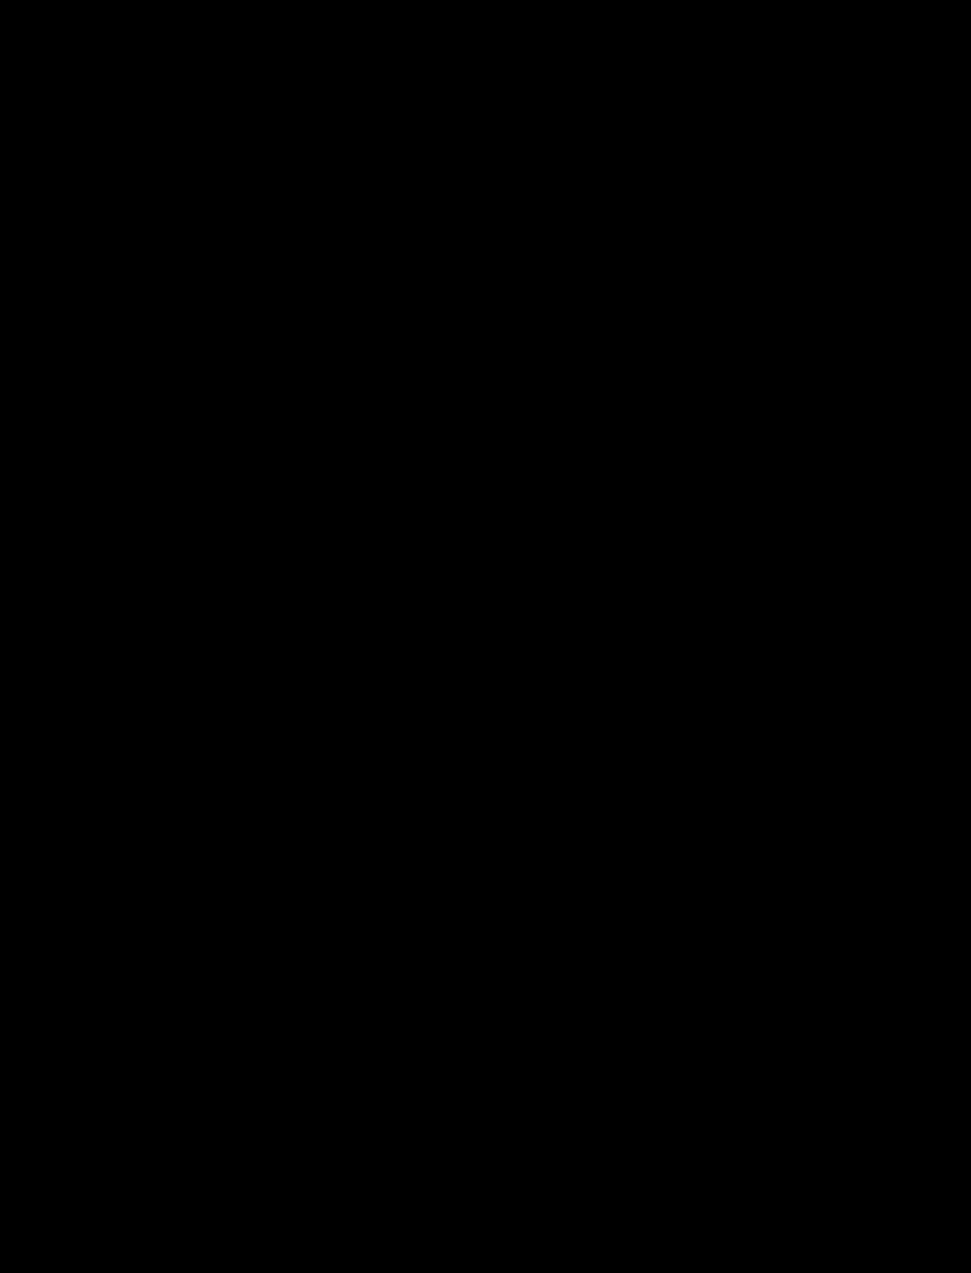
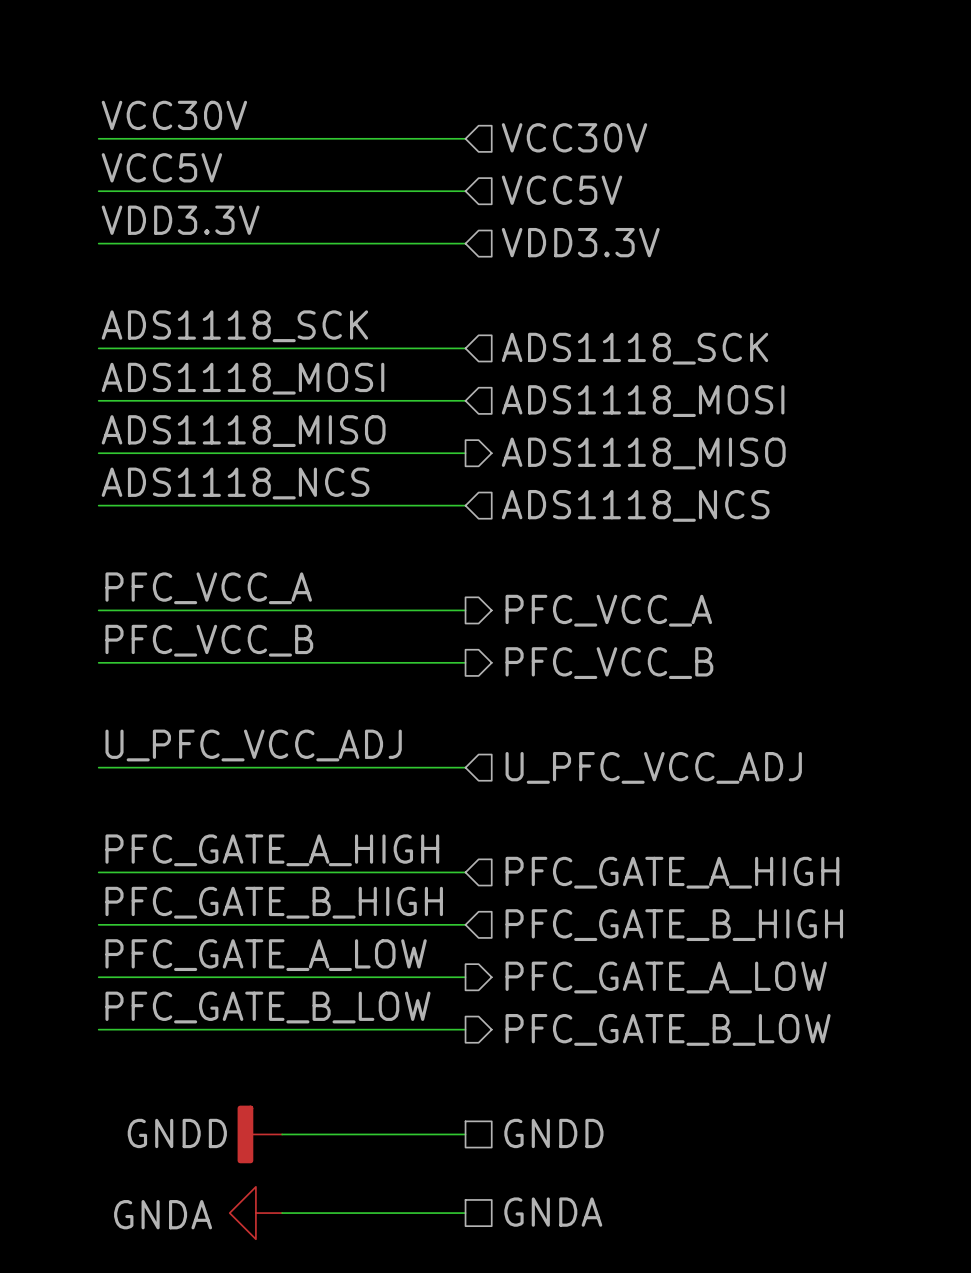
label: none -> VCC30V (174, 115)
hierarchical label: none -> VCC30V (574, 137)
wire: none -> (98, 138) (465, 138)
label: none -> VCC5V (161, 167)
hierarchical label: none -> VCC5V (562, 190)
wire: none -> (98, 191) (465, 191)
label: none -> VDD3.3V (180, 220)
hierarchical label: none -> VDD3.3V (580, 242)
wire: none -> (98, 243) (465, 243)
label: none -> ADS1118_SCK (234, 326)
wire: none -> (98, 348) (465, 348)
hierarchical label: none -> ADS1118_SCK (635, 348)
label: none -> ADS1118_MOSI (243, 378)
wire: none -> (98, 400) (465, 400)
hierarchical label: none -> ADS1118_MOSI (643, 401)
label: none -> ADS1118_MISO (243, 431)
wire: none -> (98, 453) (465, 453)
hierarchical label: none -> ADS1118_MISO (643, 453)
label: none -> ADS1118_NCS (235, 483)
wire: none -> (98, 505) (465, 505)
hierarchical label: none -> ADS1118_NCS (635, 505)
label: none -> PFC_VCC_A (208, 588)
wire: none -> (98, 610) (465, 610)
hierarchical label: none -> PFC_VCC_A (608, 610)
label: none -> PFC_VCC_B (209, 640)
wire: none -> (98, 662) (465, 662)
hierarchical label: none -> PFC_VCC_B (609, 663)
label: none -> U_PFC_VCC_ADJ (253, 745)
wire: none -> (98, 767) (465, 767)
hierarchical label: none -> U_PFC_VCC_ADJ (653, 767)
label: none -> PFC_GATE_A_HIGH (272, 850)
wire: none -> (98, 872) (465, 872)
hierarchical label: none -> PFC_GATE_A_HIGH (672, 872)
label: none -> PFC_GATE_B_HIGH (274, 902)
wire: none -> (98, 924) (465, 924)
hierarchical label: none -> PFC_GATE_B_HIGH (674, 925)
label: none -> PFC_GATE_A_LOW (266, 955)
wire: none -> (98, 977) (465, 977)
hierarchical label: none -> PFC_GATE_A_LOW (666, 977)
label: none -> PFC_GATE_B_LOW (267, 1007)
wire: none -> (98, 1029) (465, 1029)
hierarchical label: none -> PFC_GATE_B_LOW (668, 1029)
hierarchical label: none -> GNDD (553, 1133)
power symbol: none -> GNDD (259, 1134)
wire: none -> (282, 1134) (465, 1134)
hierarchical label: none -> GNDA (553, 1212)
power symbol: none -> GNDA (255, 1213)
wire: none -> (282, 1213) (465, 1213)

